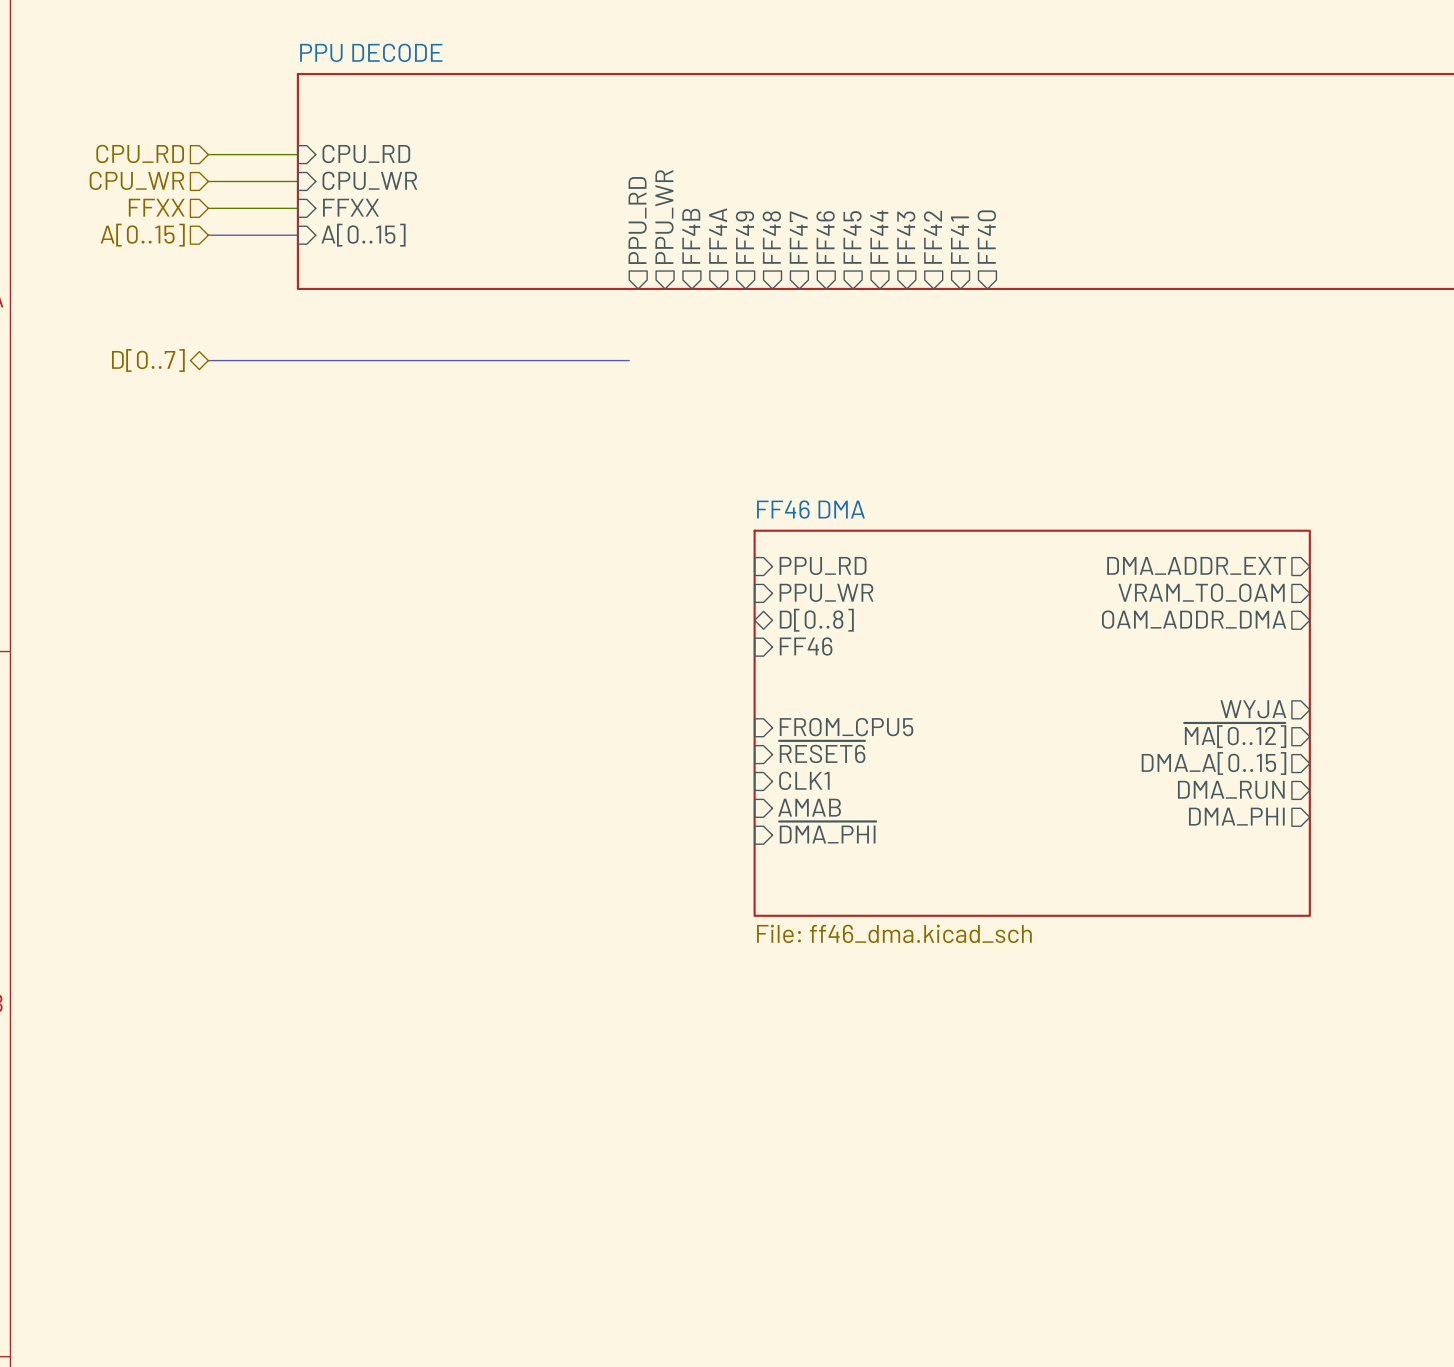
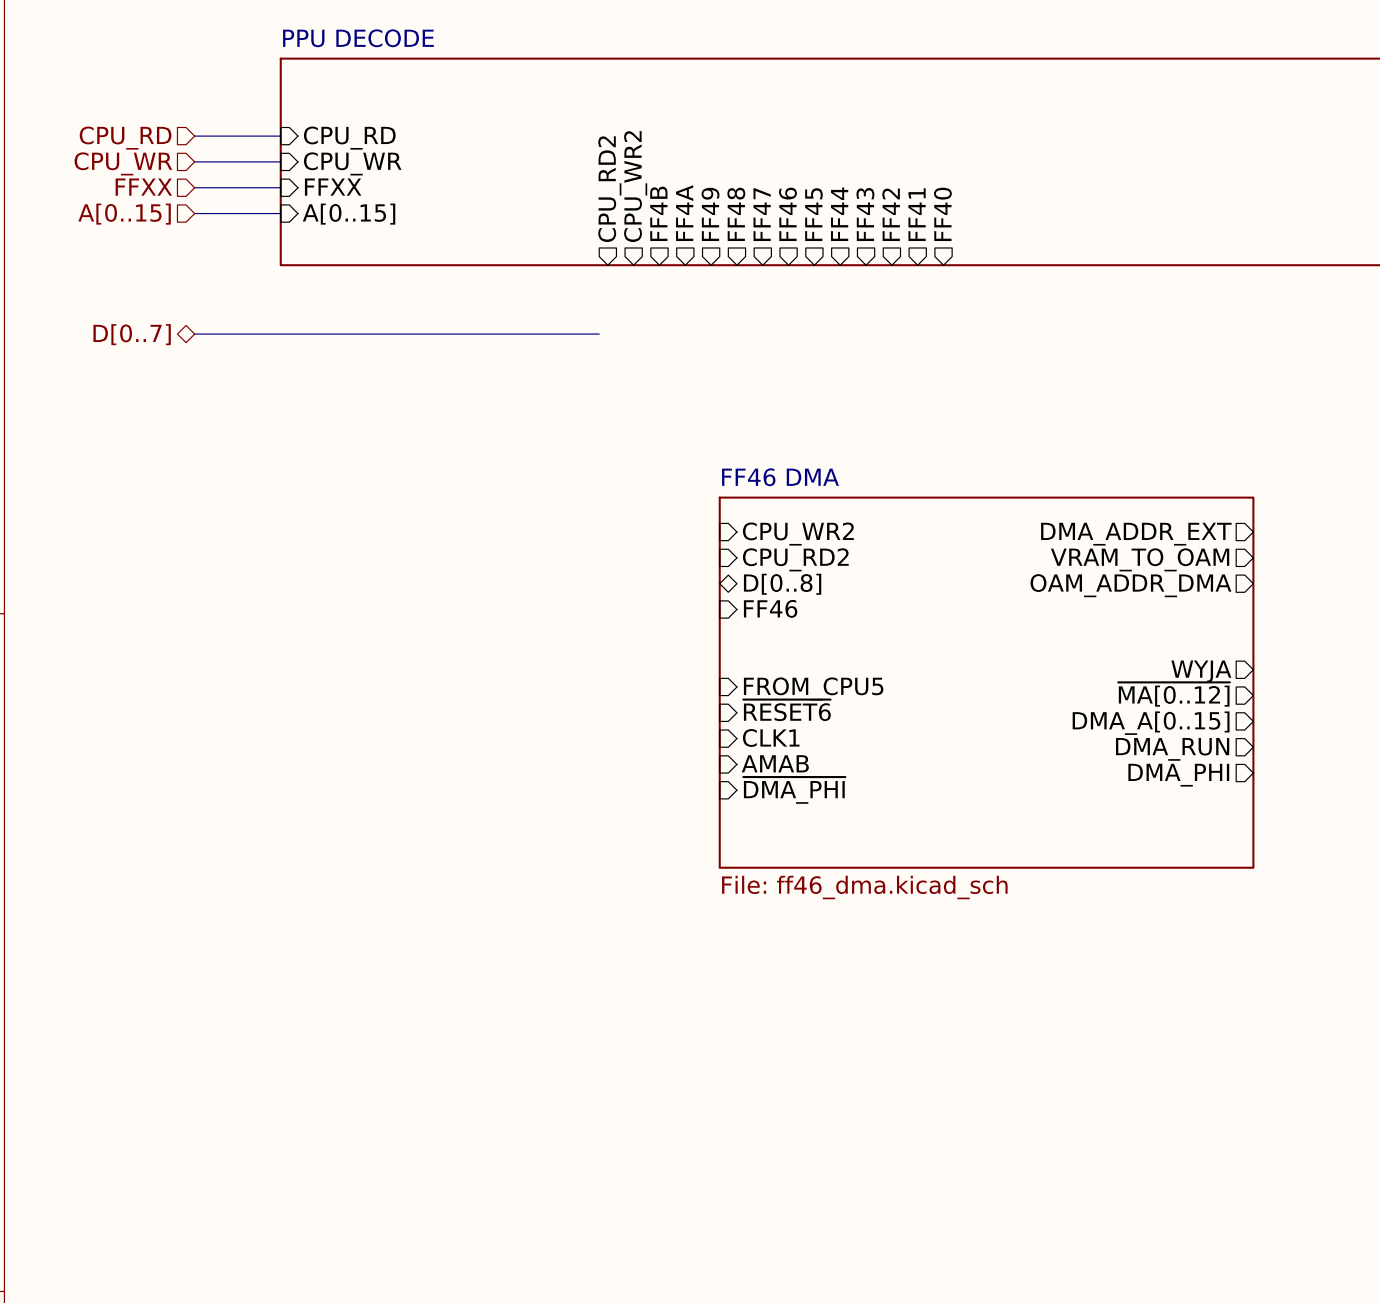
sheet pin: PPU_WR (664, 217) -> CPU_WR2 (635, 186)
sheet pin: PPU_RD (637, 220) -> CPU_RD2 (609, 189)
sheet pin: PPU_RD (823, 565) -> CPU_WR2 (798, 534)
sheet pin: PPU_WR (826, 592) -> CPU_RD2 (795, 559)

